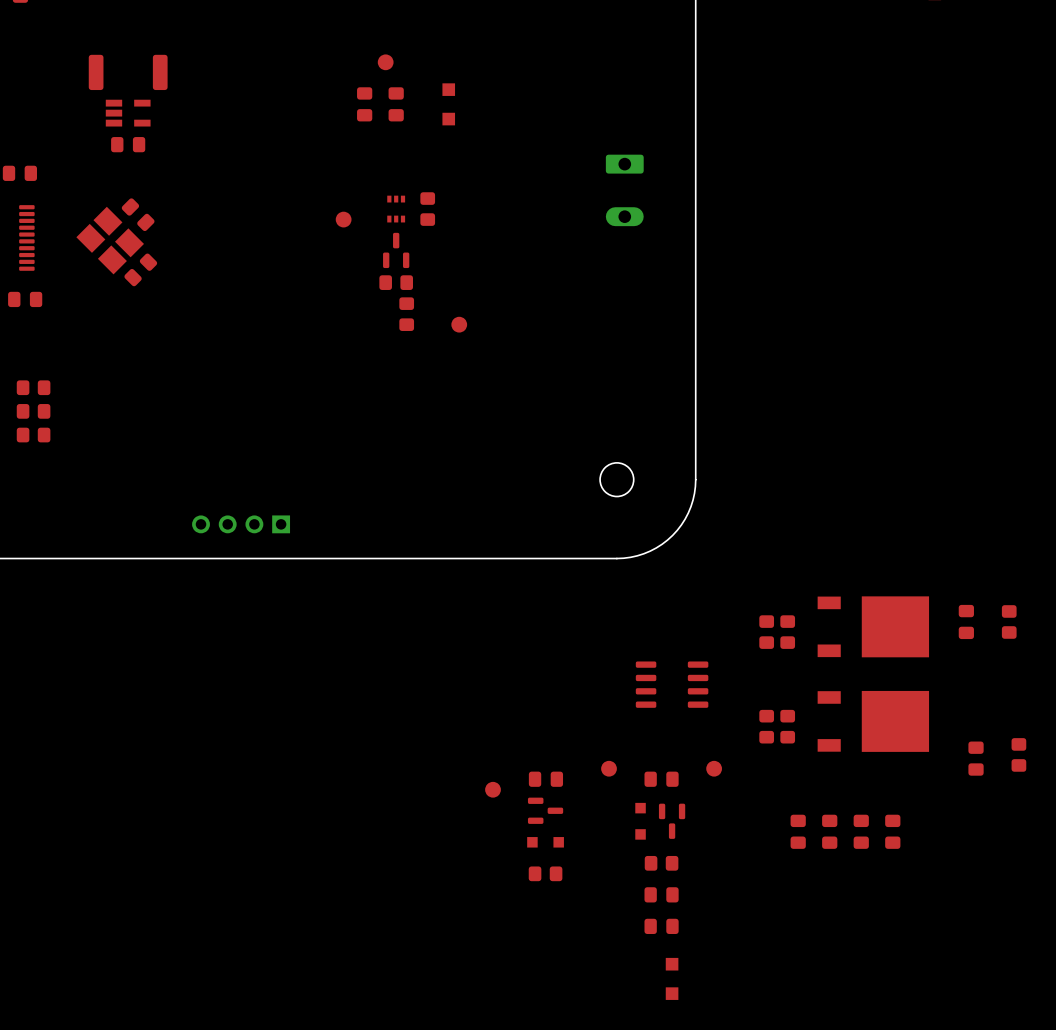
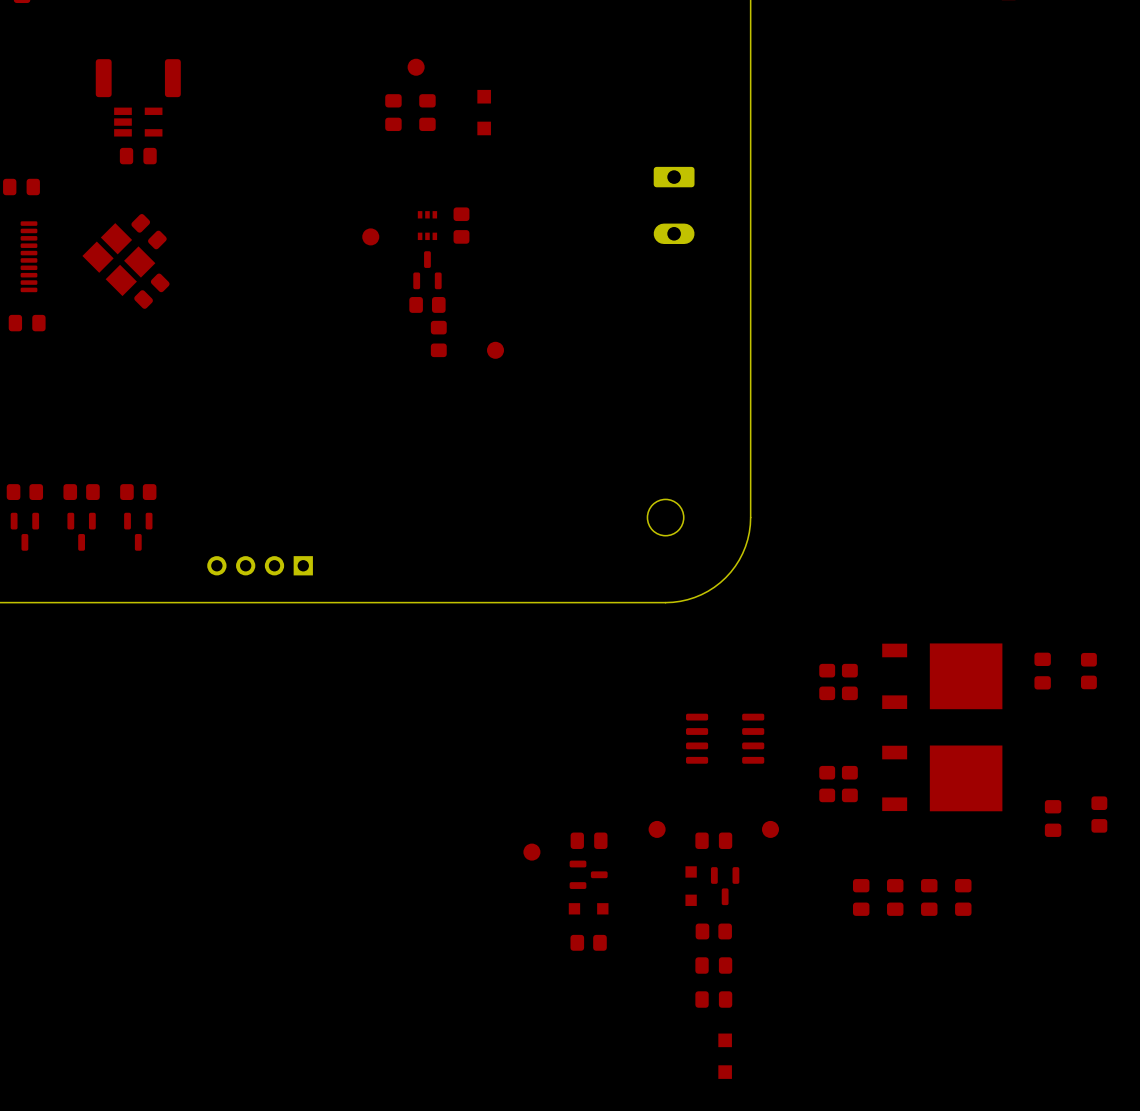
part: (33, 387) -> none
part: (33, 411) -> none
part: (33, 435) -> none
part: none -> (24, 492)
part: none -> (81, 492)
part: none -> (138, 492)
part: none -> (24, 531)
part: none -> (81, 531)
part: none -> (138, 531)

